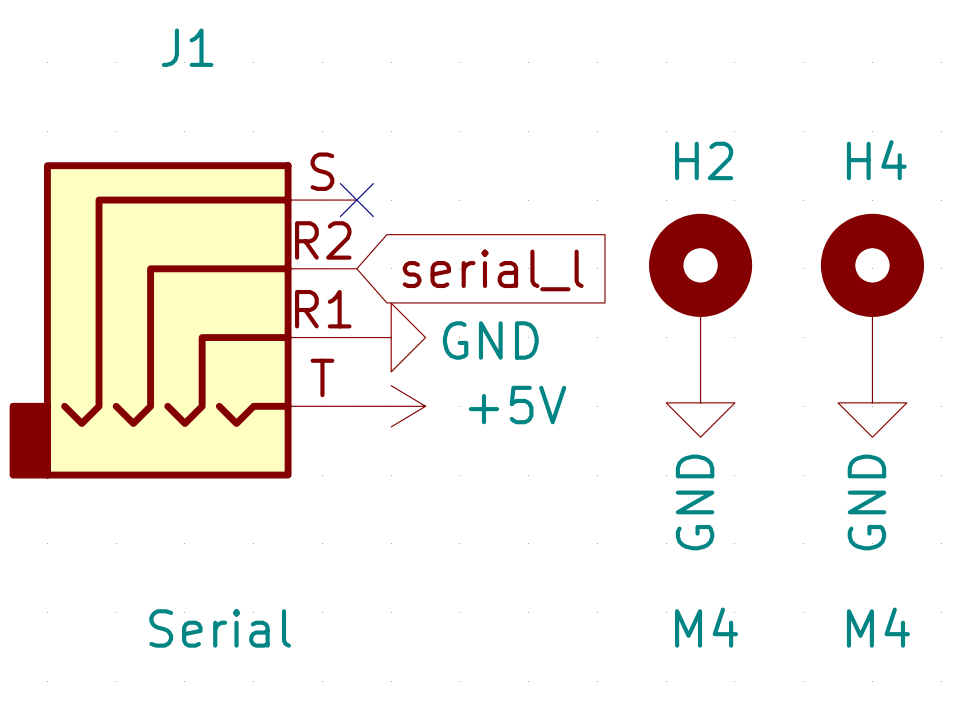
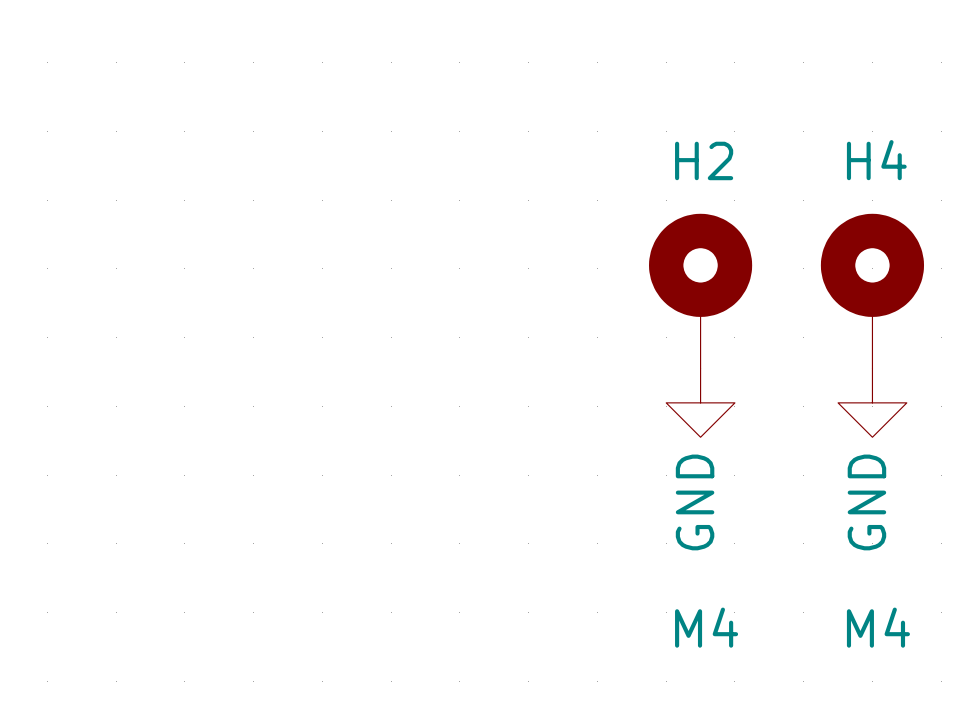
no-connect mark: (356, 200) -> none
global label: serial_l (493, 270) -> none
J1: Serial (183, 320) -> none
power symbol: GND (391, 337) -> none
power symbol: +5V (391, 406) -> none

